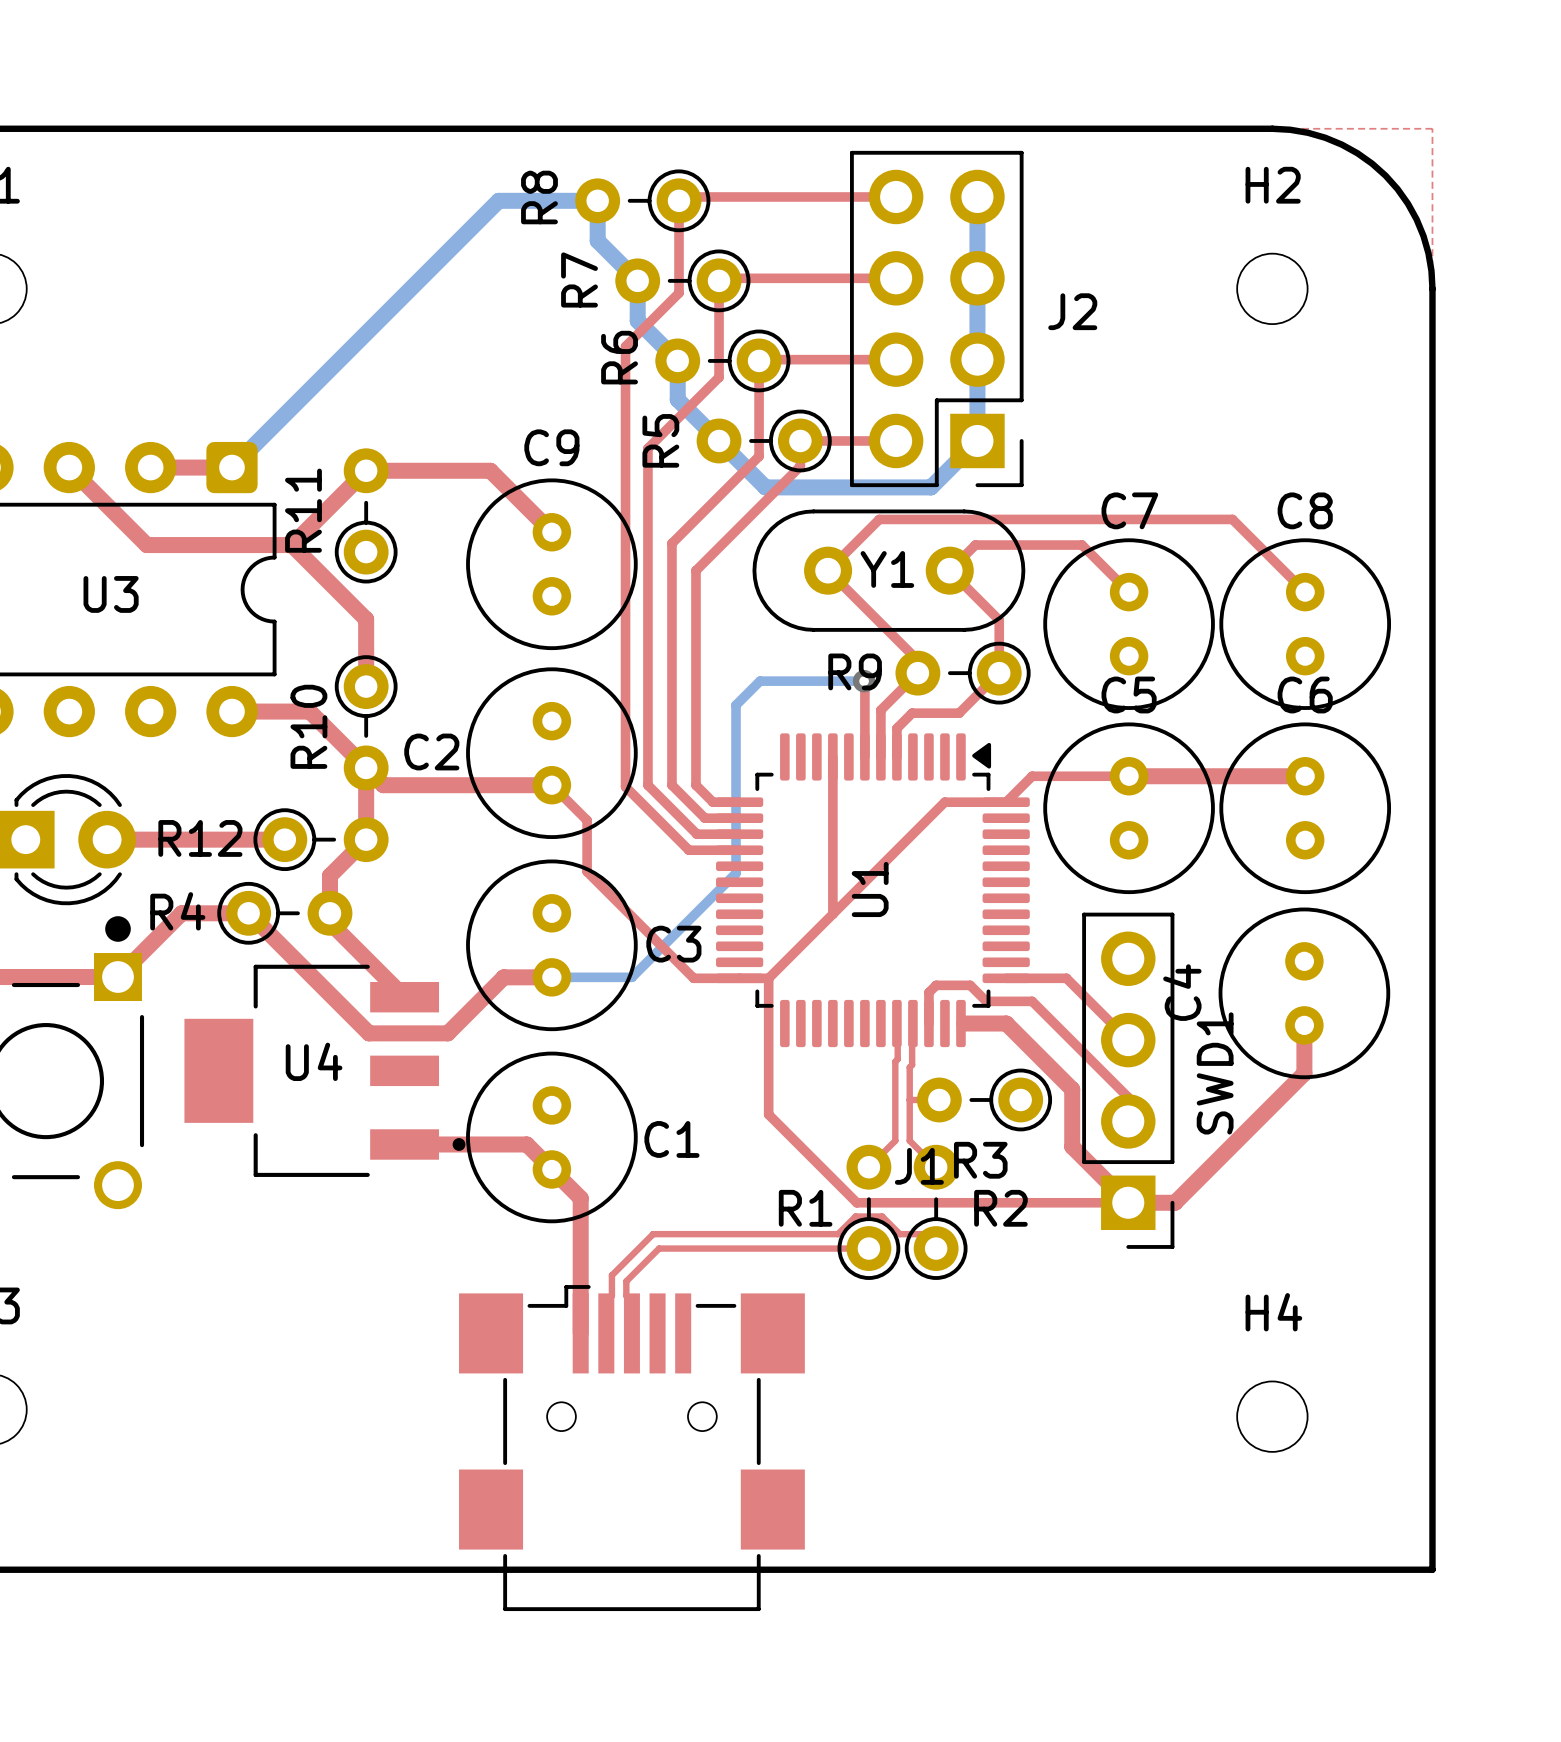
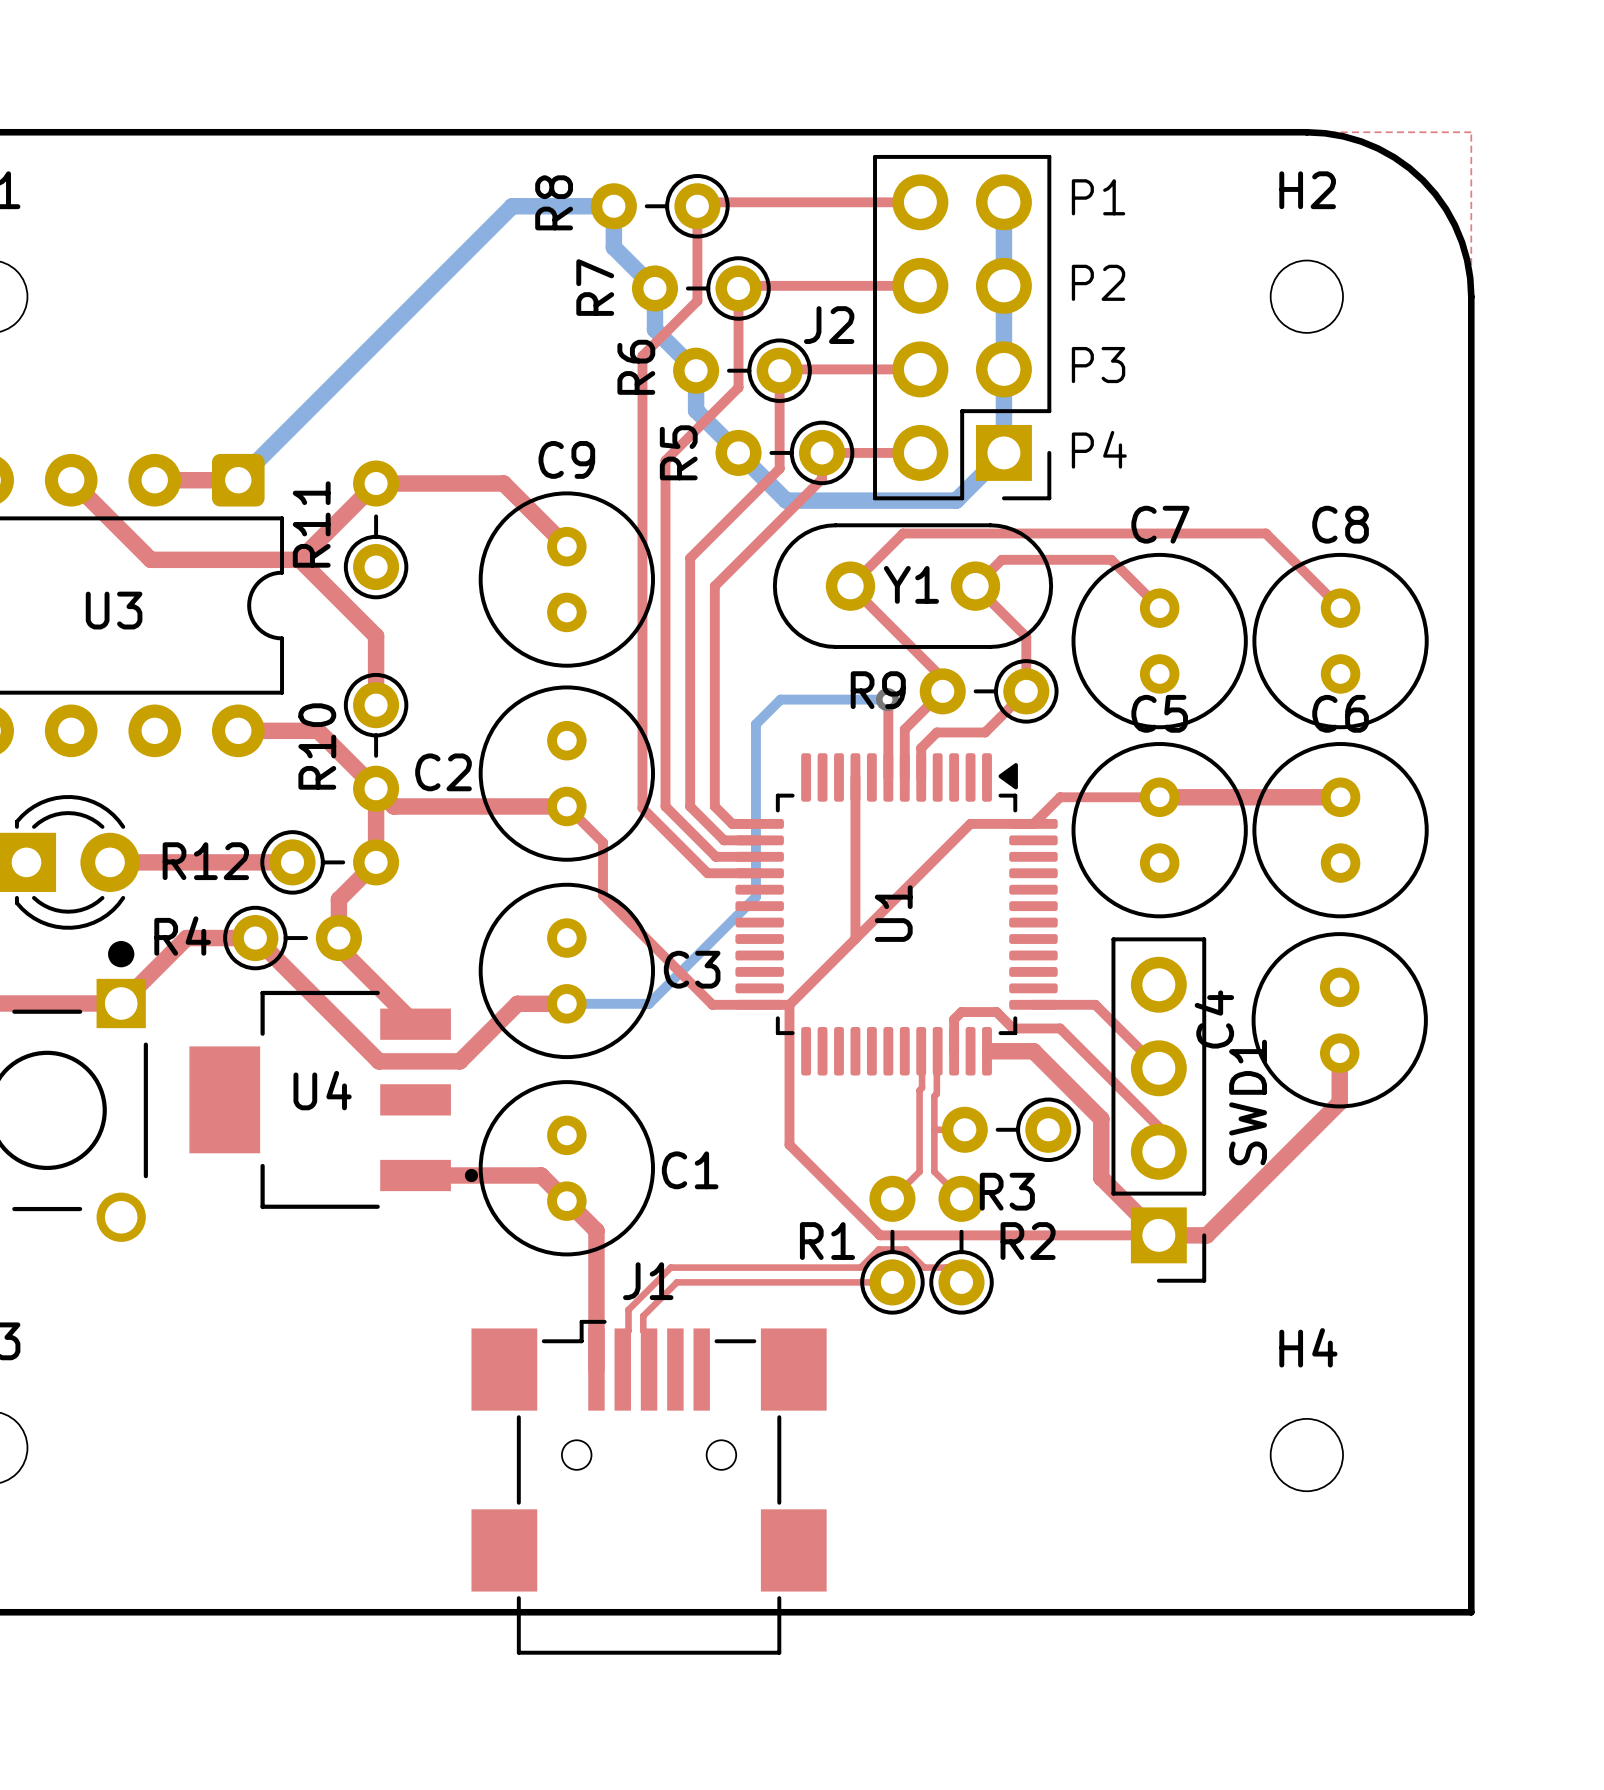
text: none -> P1 (1098, 197)
text: none -> P2 (1098, 282)
J2 name position: J2 (1072, 311) -> J2 (829, 325)
text: none -> P3 (1098, 365)
text: none -> P4 (1099, 449)
J1 name position: J1 (919, 1166) -> J1 (648, 1281)

